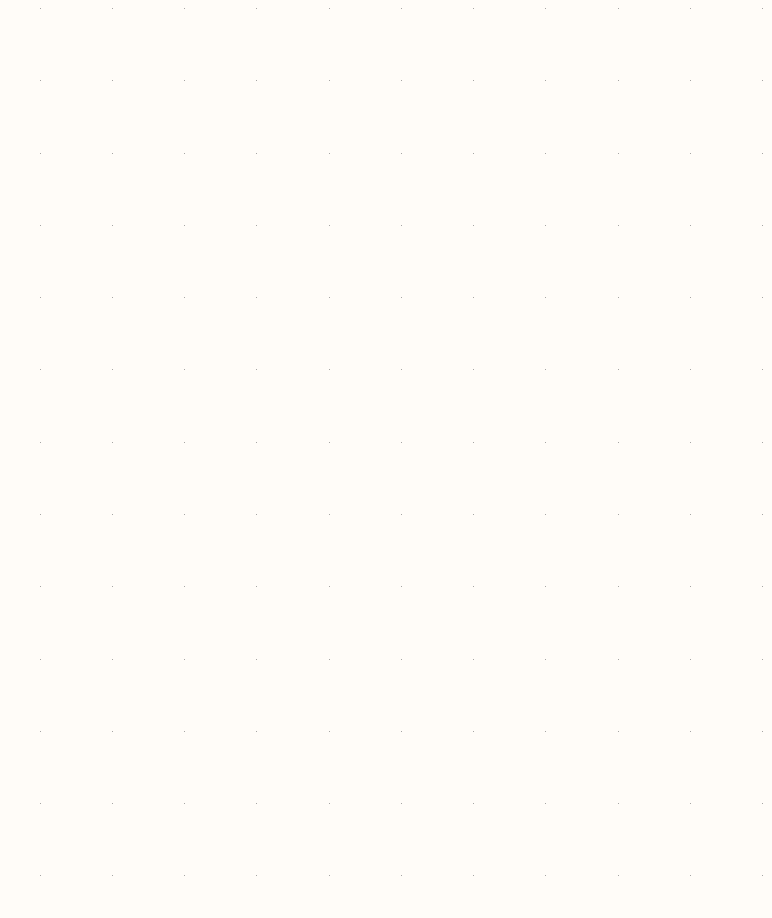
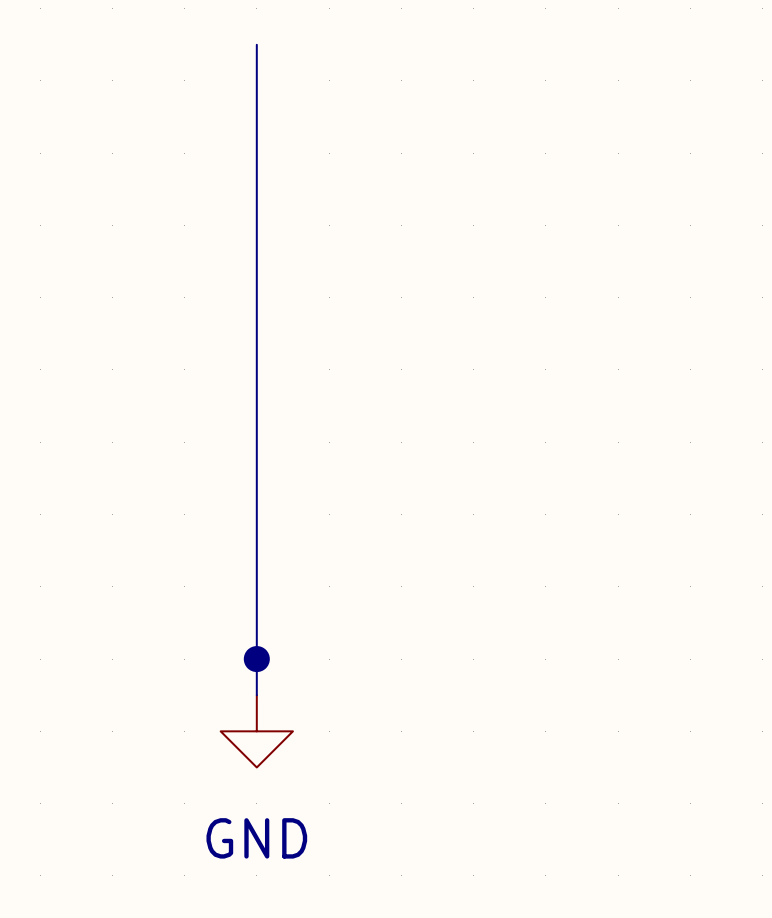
wire: none -> (256, 44) (256, 695)
junction: none -> (256, 659)
power symbol: none -> GND (256, 731)

